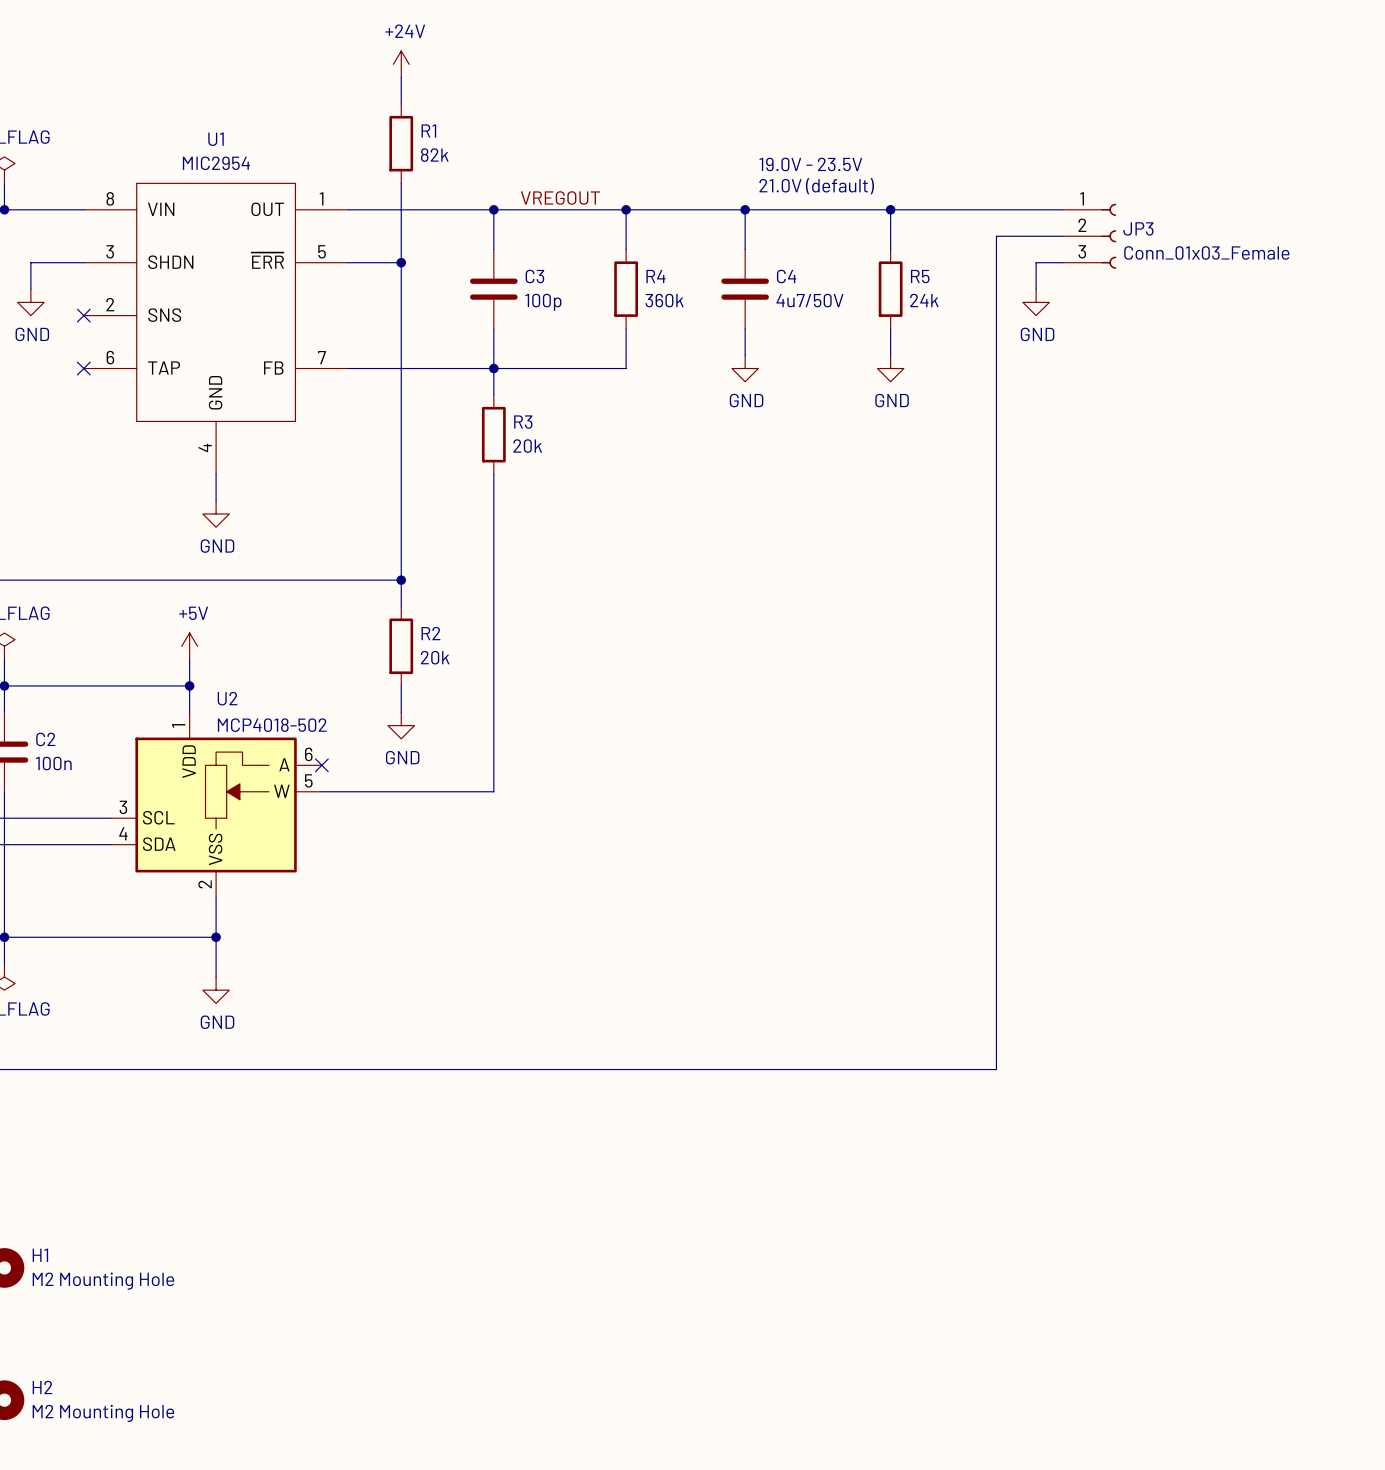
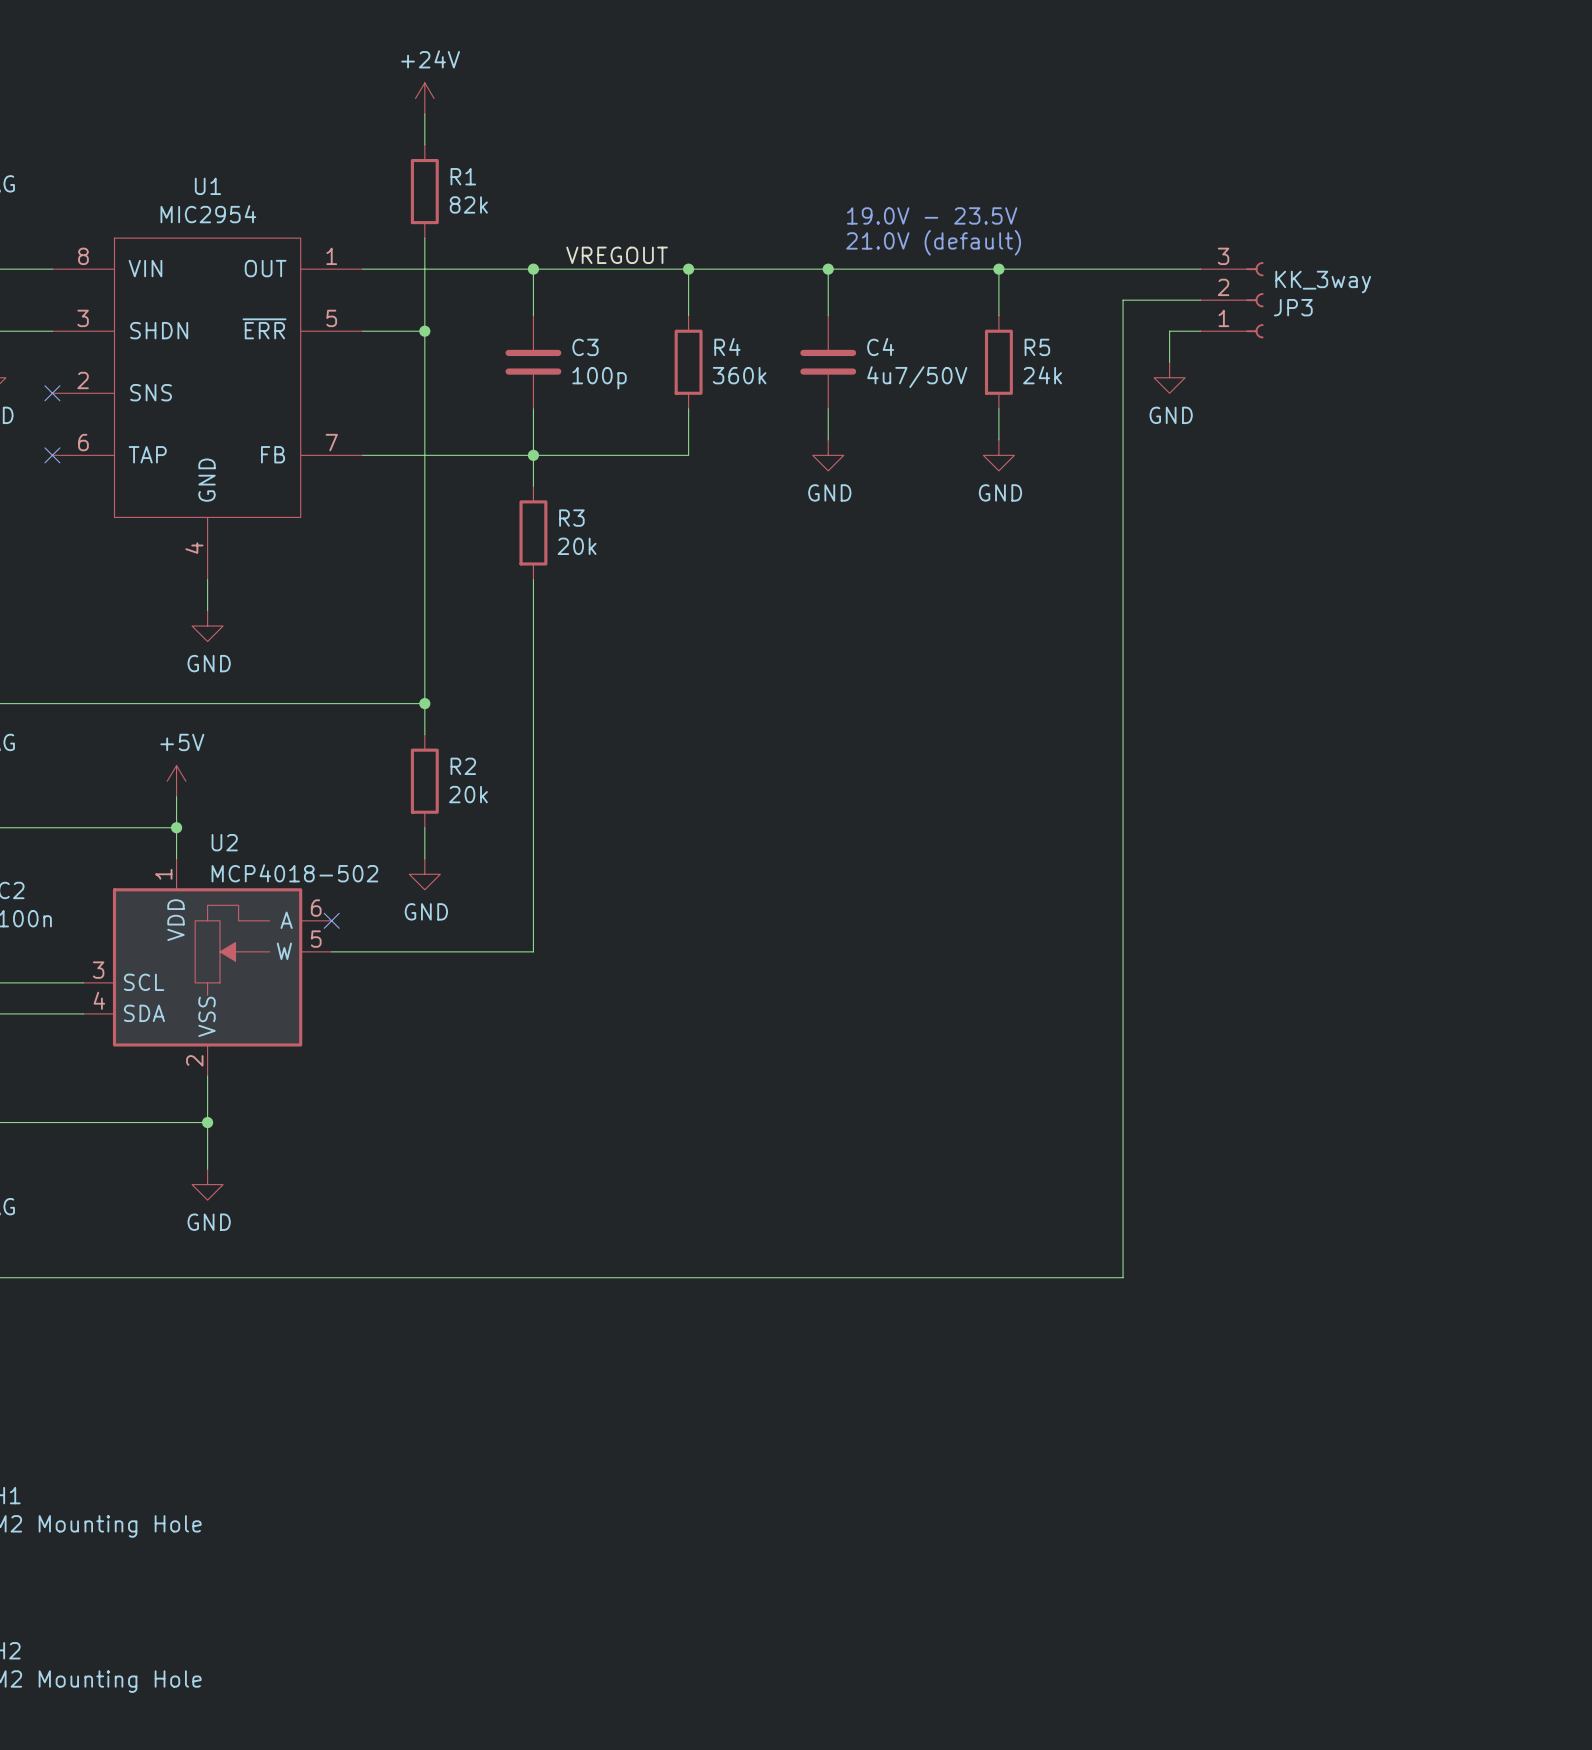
JP3 flip: as is (1108, 236) -> up-down (1254, 300)
JP3 value: Conn_01x03_Female (1206, 252) -> KK_3way (1323, 282)

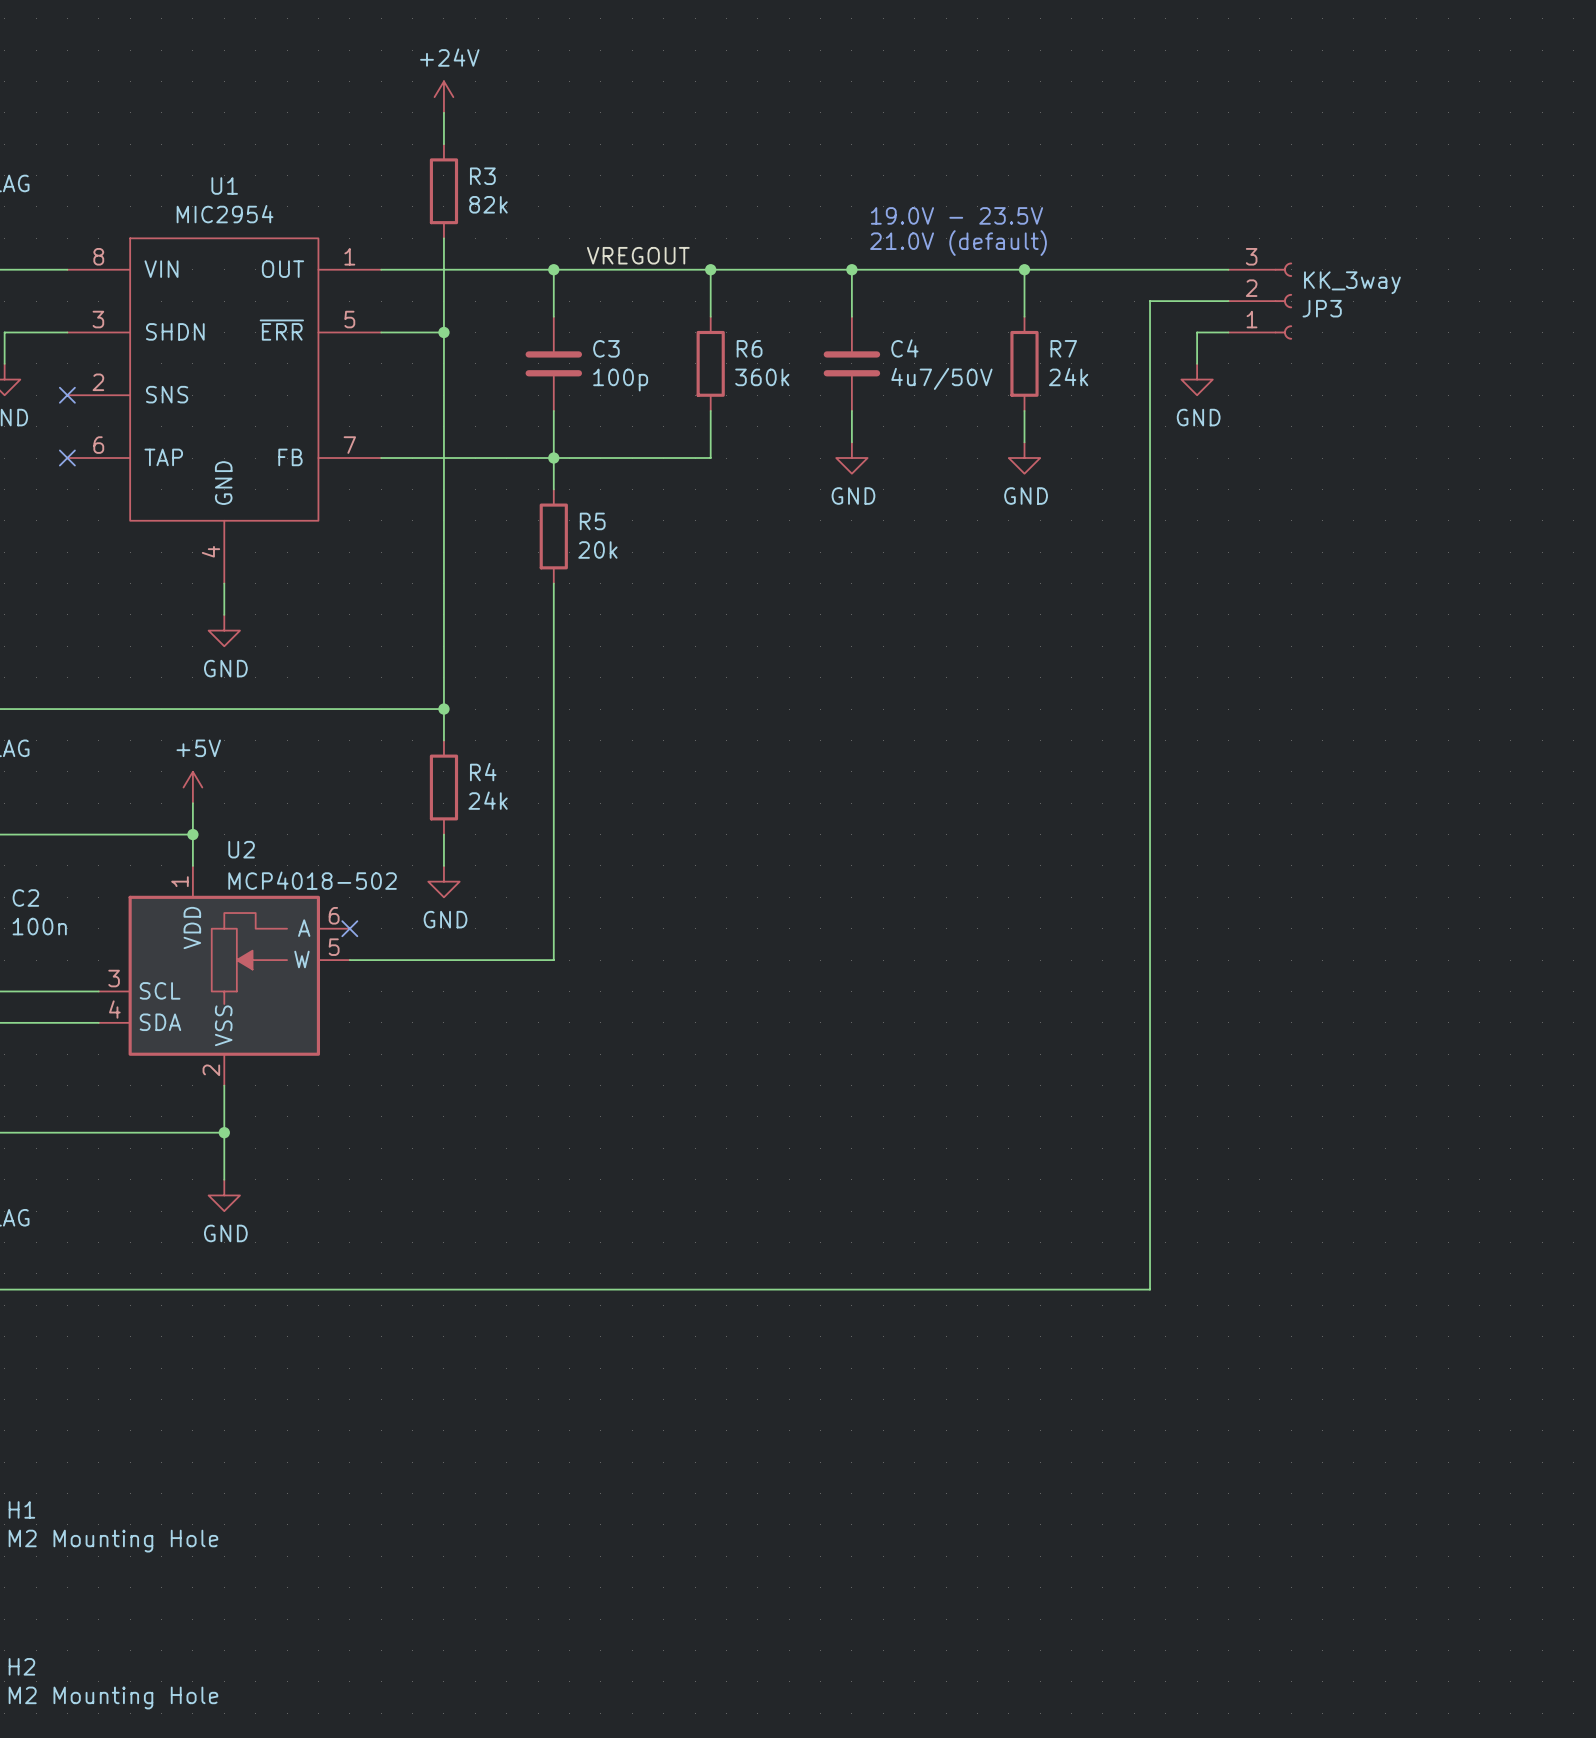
R1 name: R1 (463, 176) -> R3 (482, 176)
R4 name: R4 (727, 347) -> R6 (749, 348)
R5 name: R5 (1037, 347) -> R7 (1063, 348)
R3 name: R3 (571, 518) -> R5 (592, 521)
R2 name: R2 (463, 766) -> R4 (483, 772)
R2 value: 20k (468, 794) -> 24k (488, 800)

